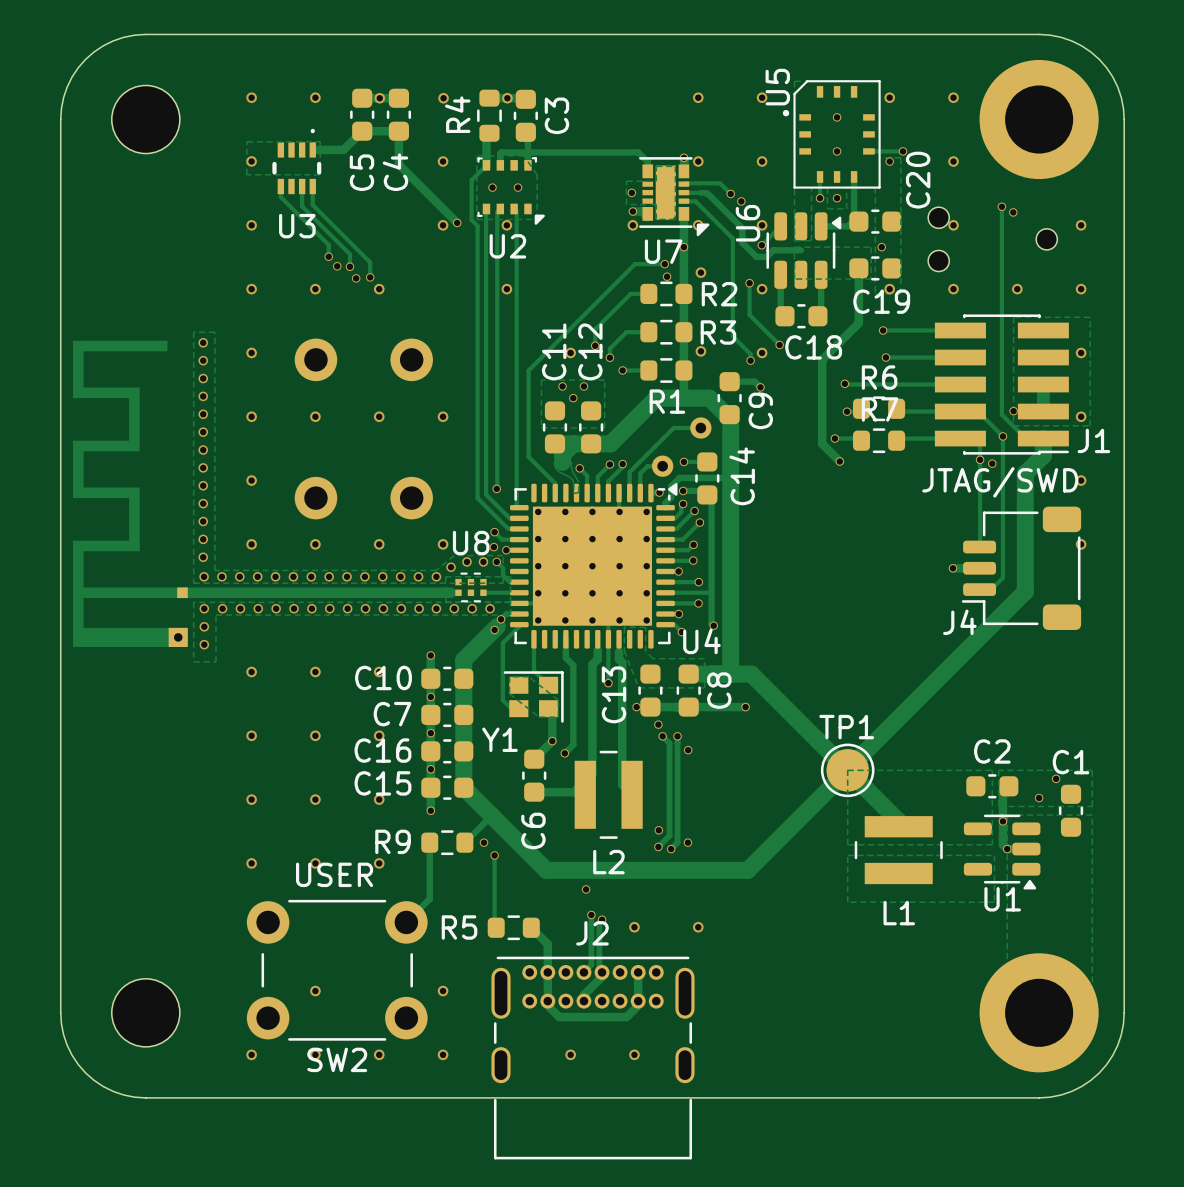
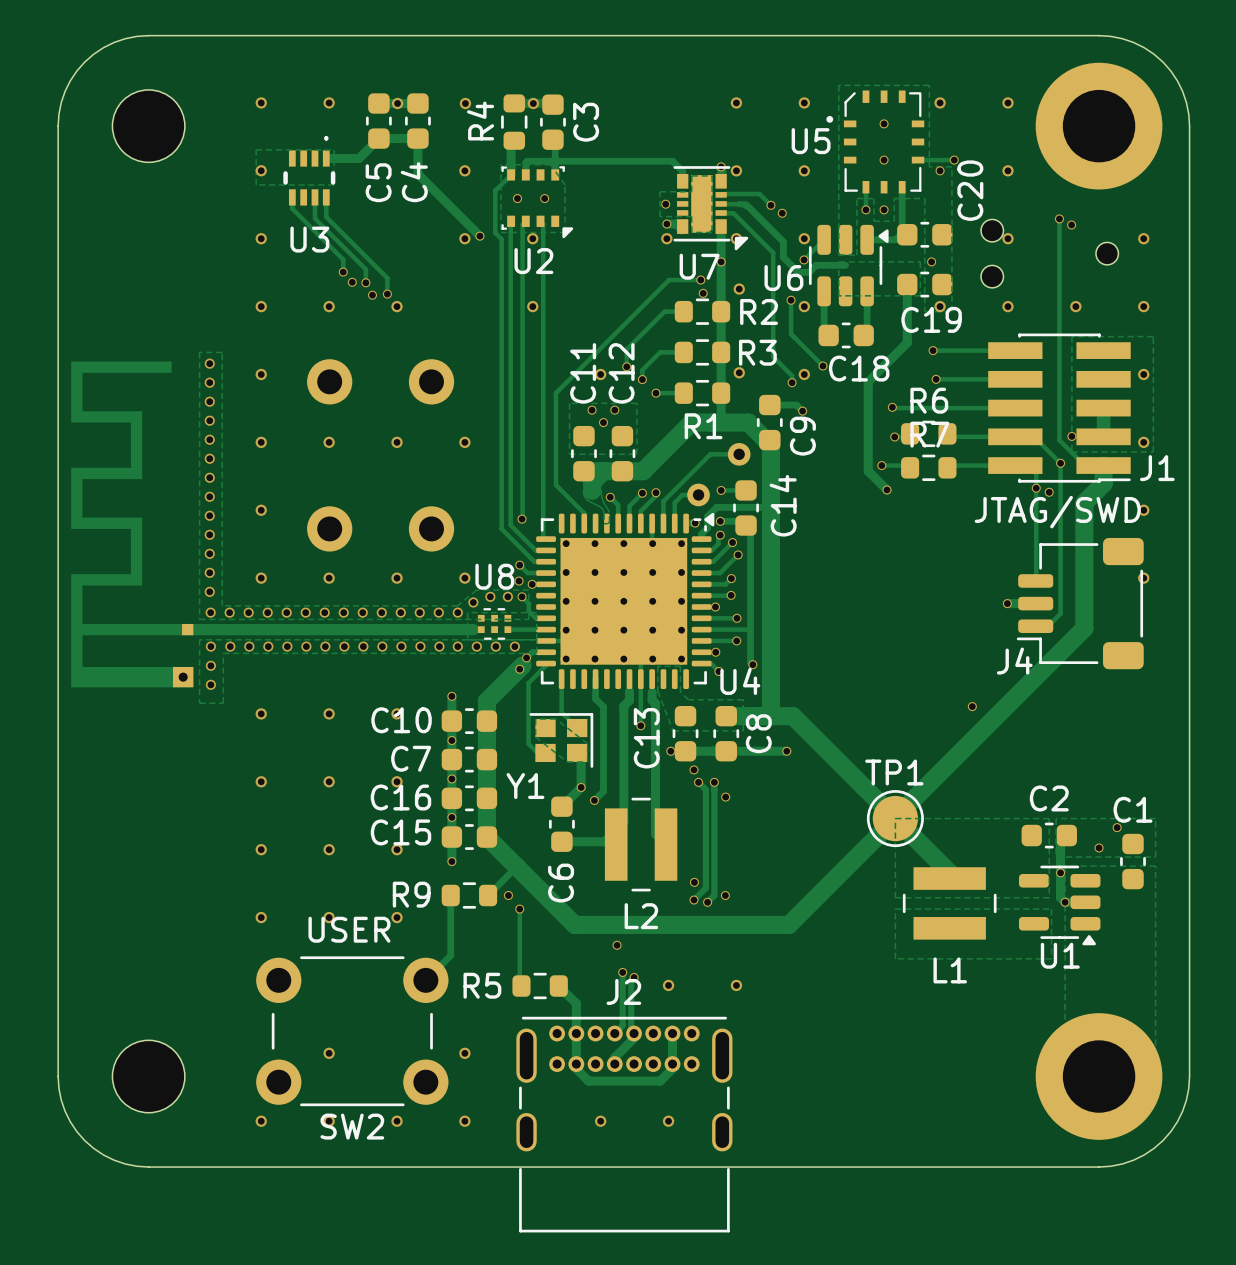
U5 footprint: [782, 80, 881, 189] -> [826, 90, 925, 194]
U5 name position: U5 (777, 87) -> U5 (811, 141)
U6 name rotation: 0° (748, 223) -> 90° clockwise (783, 278)
via: none -> (972, 706)

